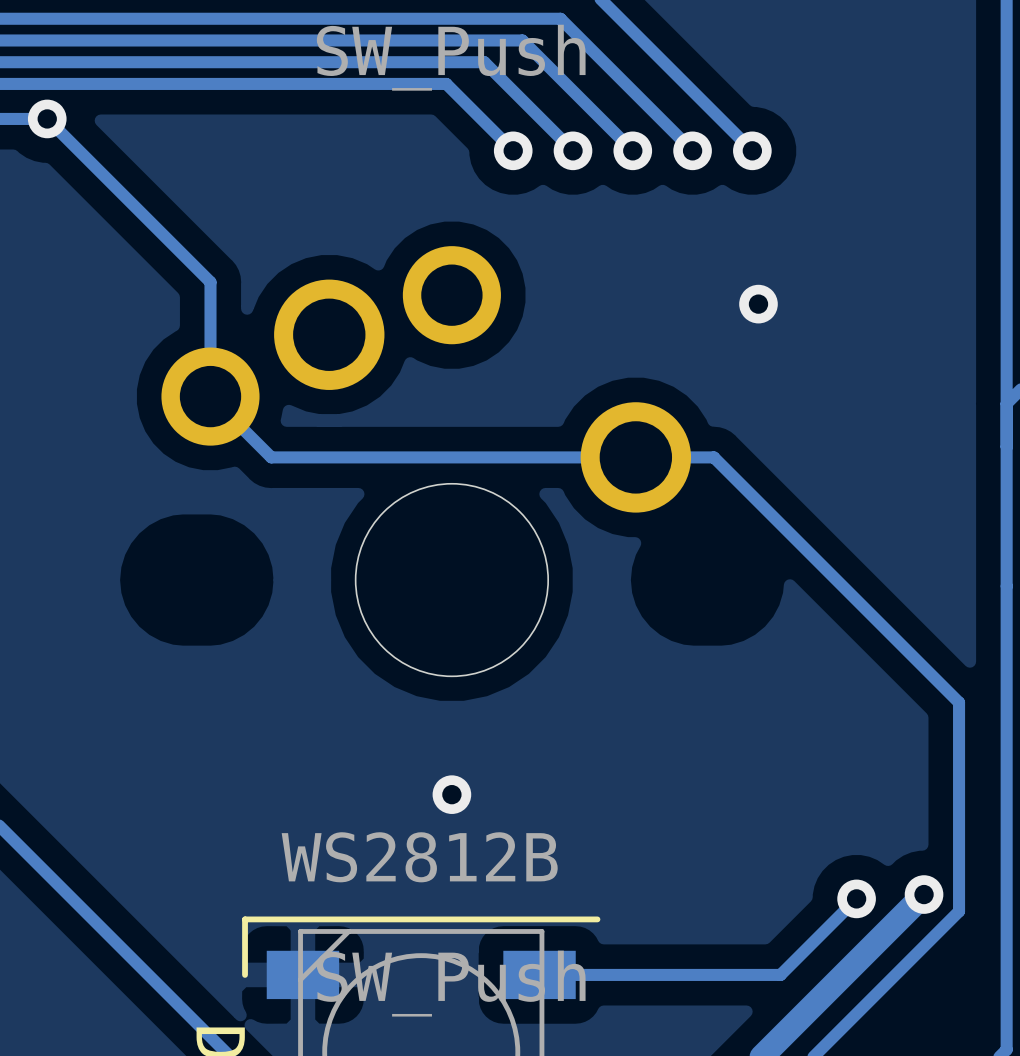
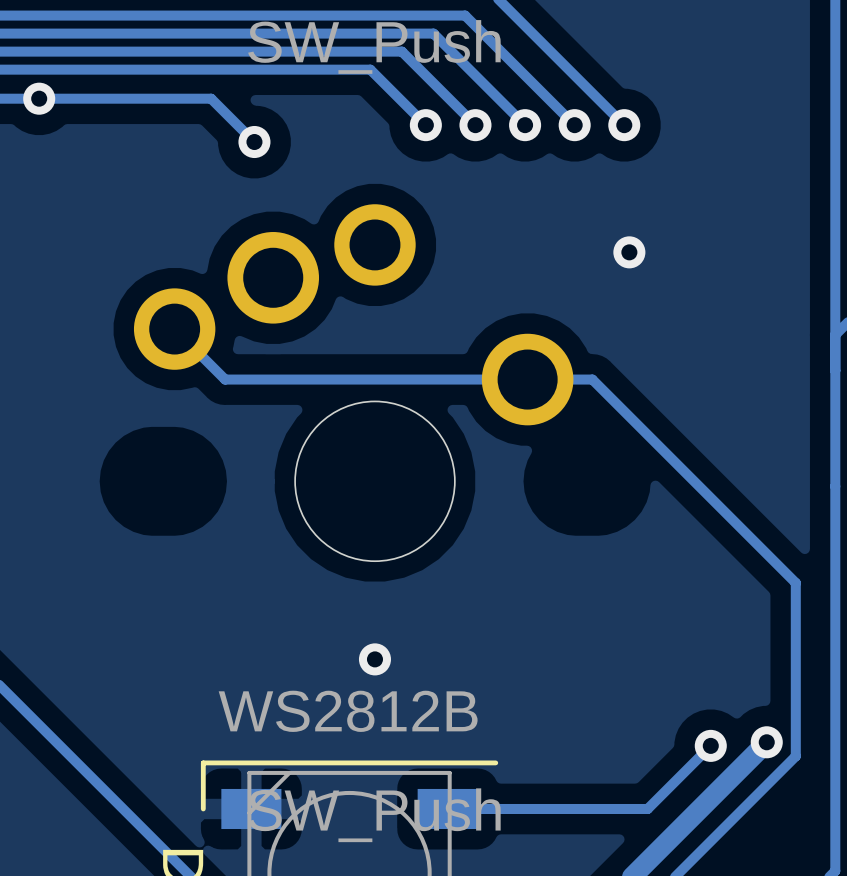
track: (47, 118) (210, 282) (210, 396) -> (39, 98) (211, 98) (254, 142)
via: none -> (254, 142)

